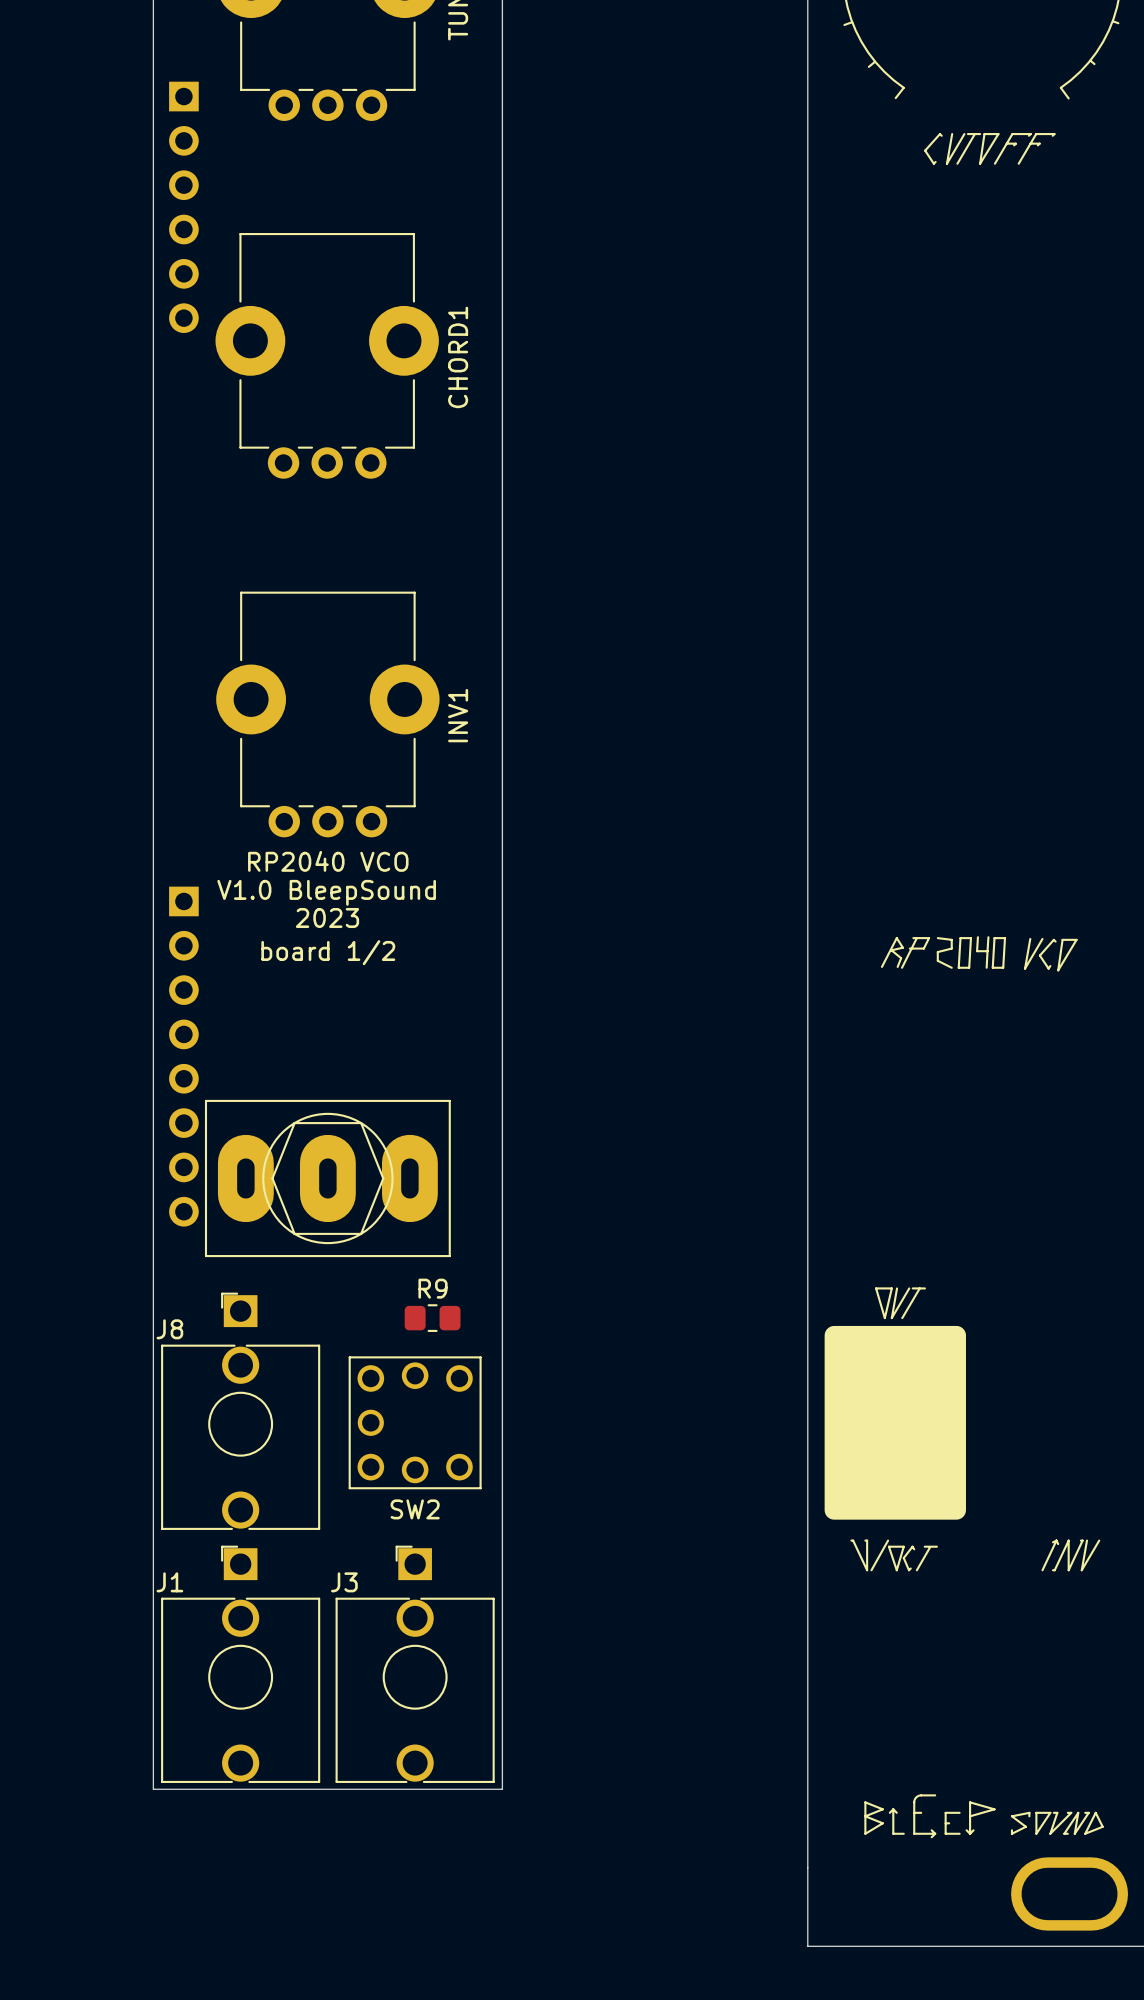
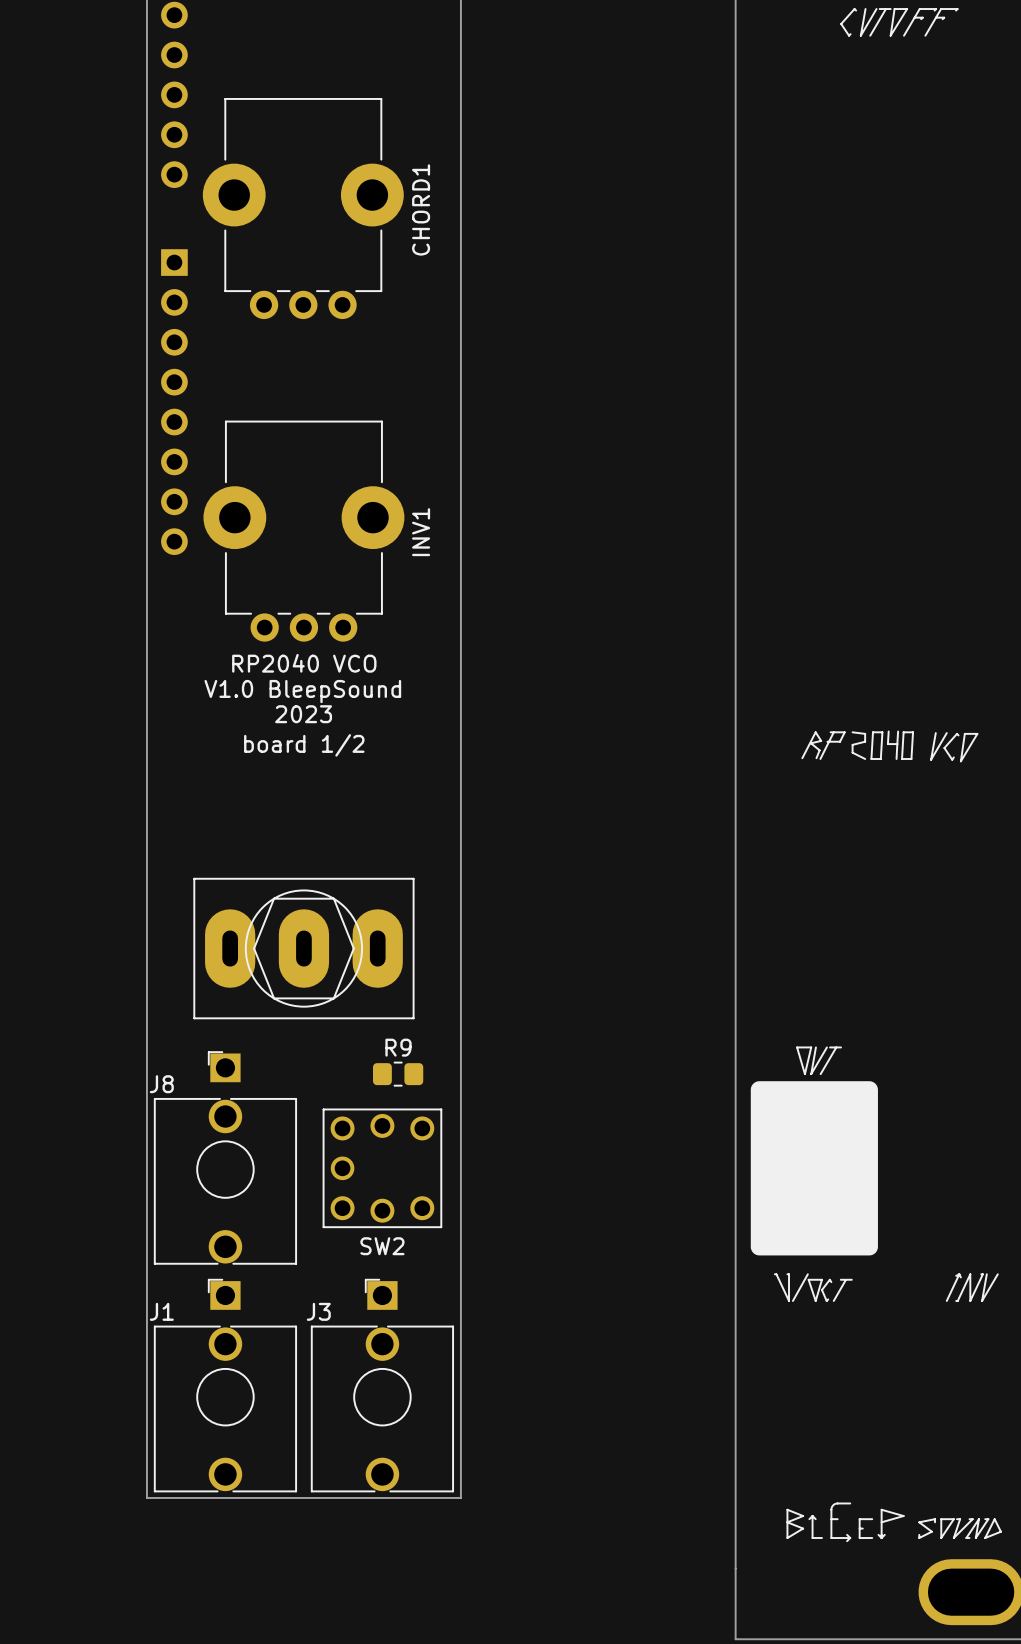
part: none -> (174, 402)
part: (183, 1056) -> none

